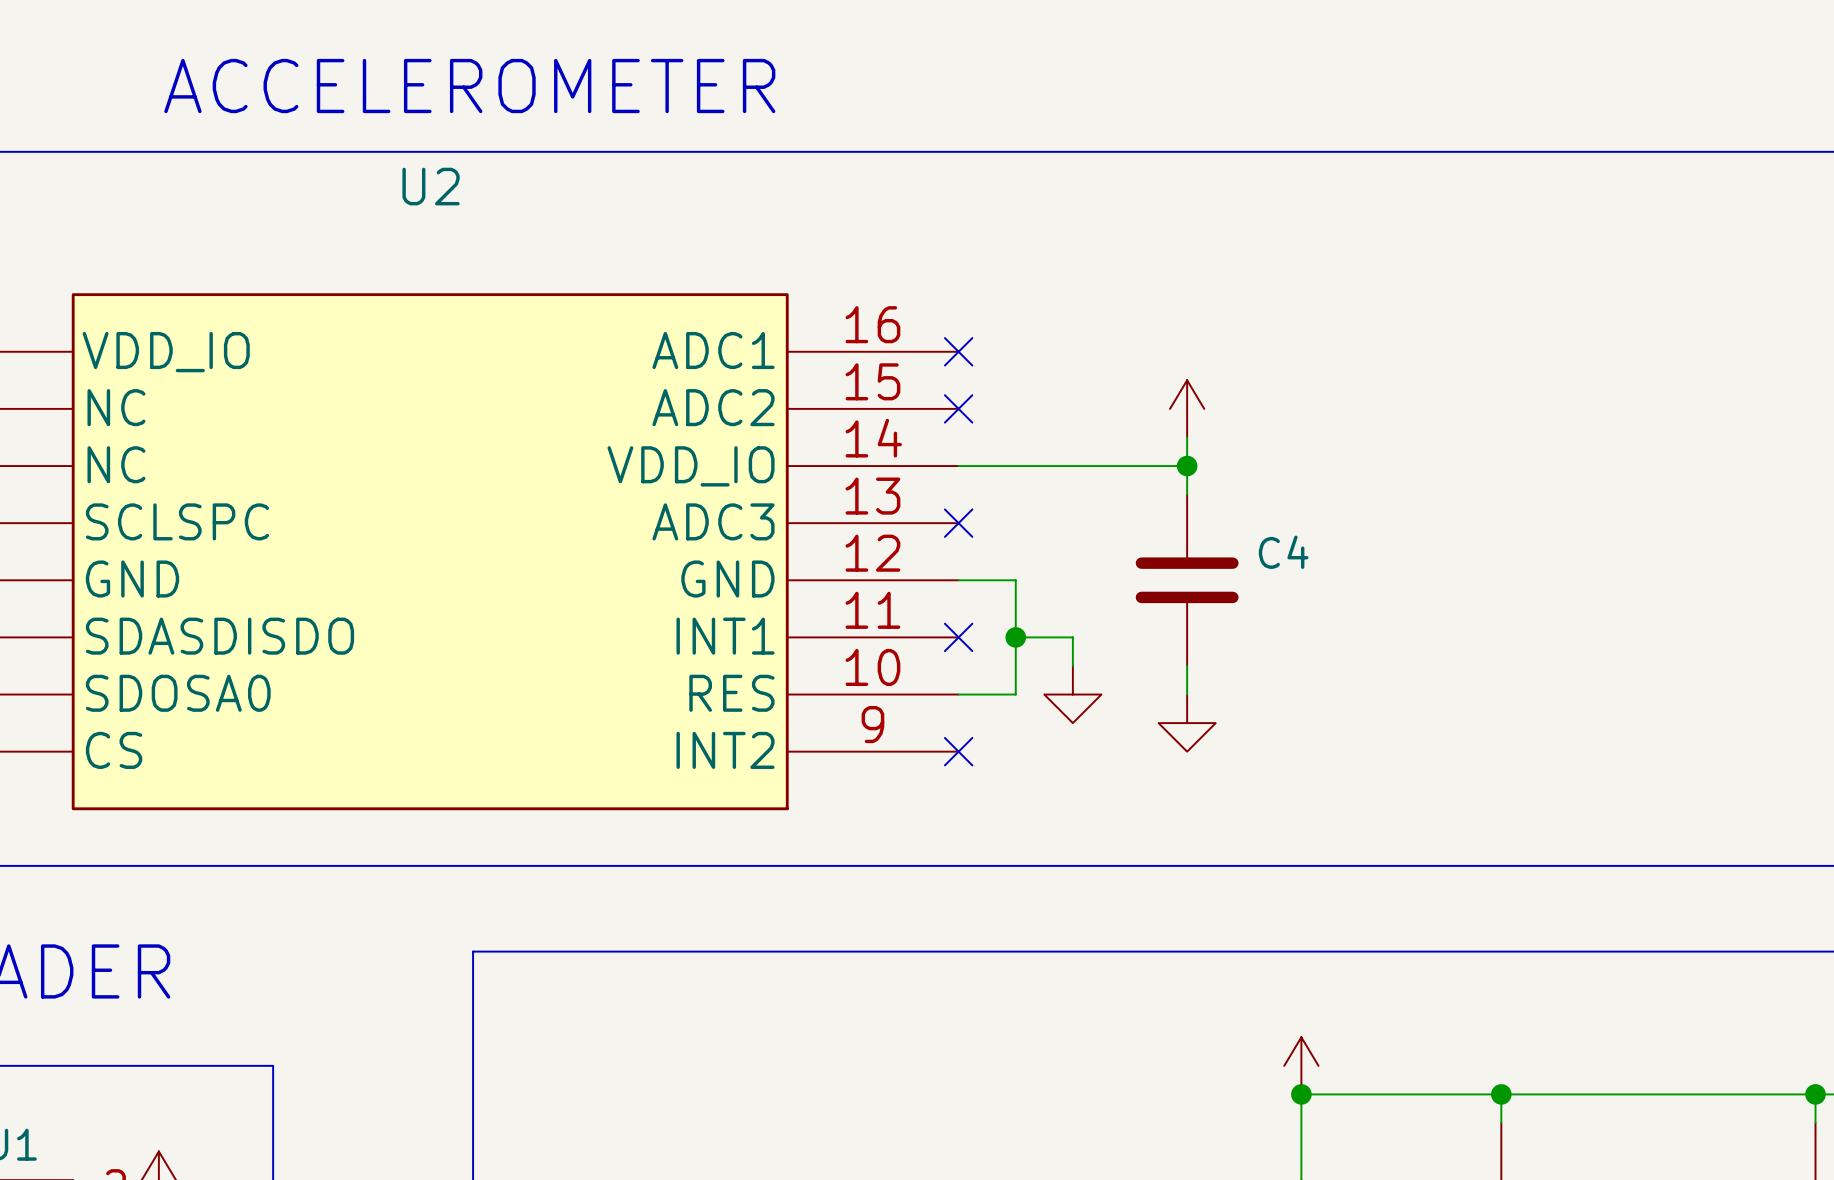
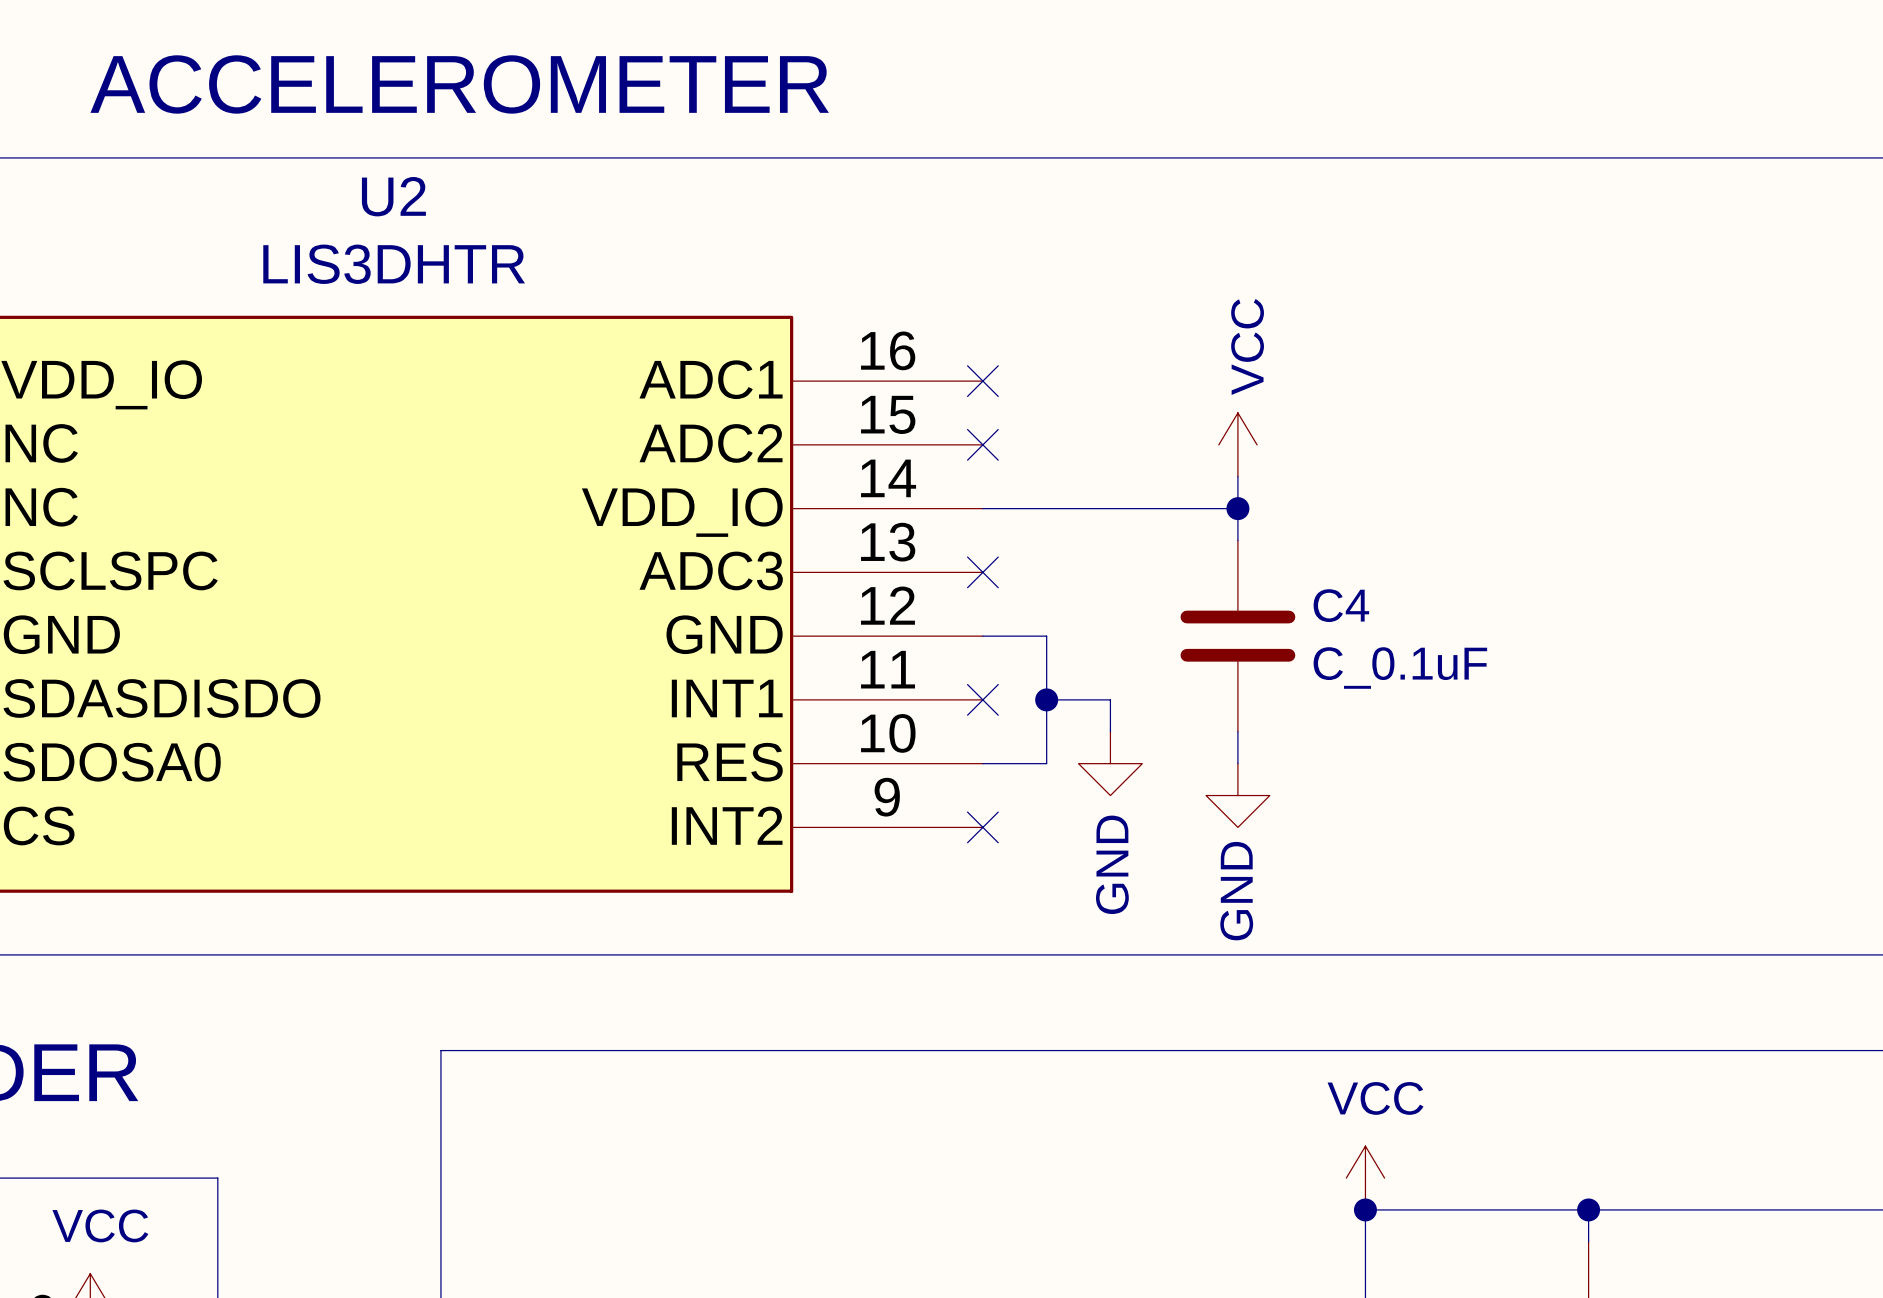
U2 value: none -> LIS3DHTR (394, 264)
power symbol text: none -> VCC (1247, 347)
C4 value: none -> C_0.1uF (1400, 668)
power symbol text: none -> GND (1112, 864)
power symbol text: none -> GND (1236, 891)
power symbol text: none -> VCC (1375, 1098)
power symbol text: none -> VCC (100, 1225)

